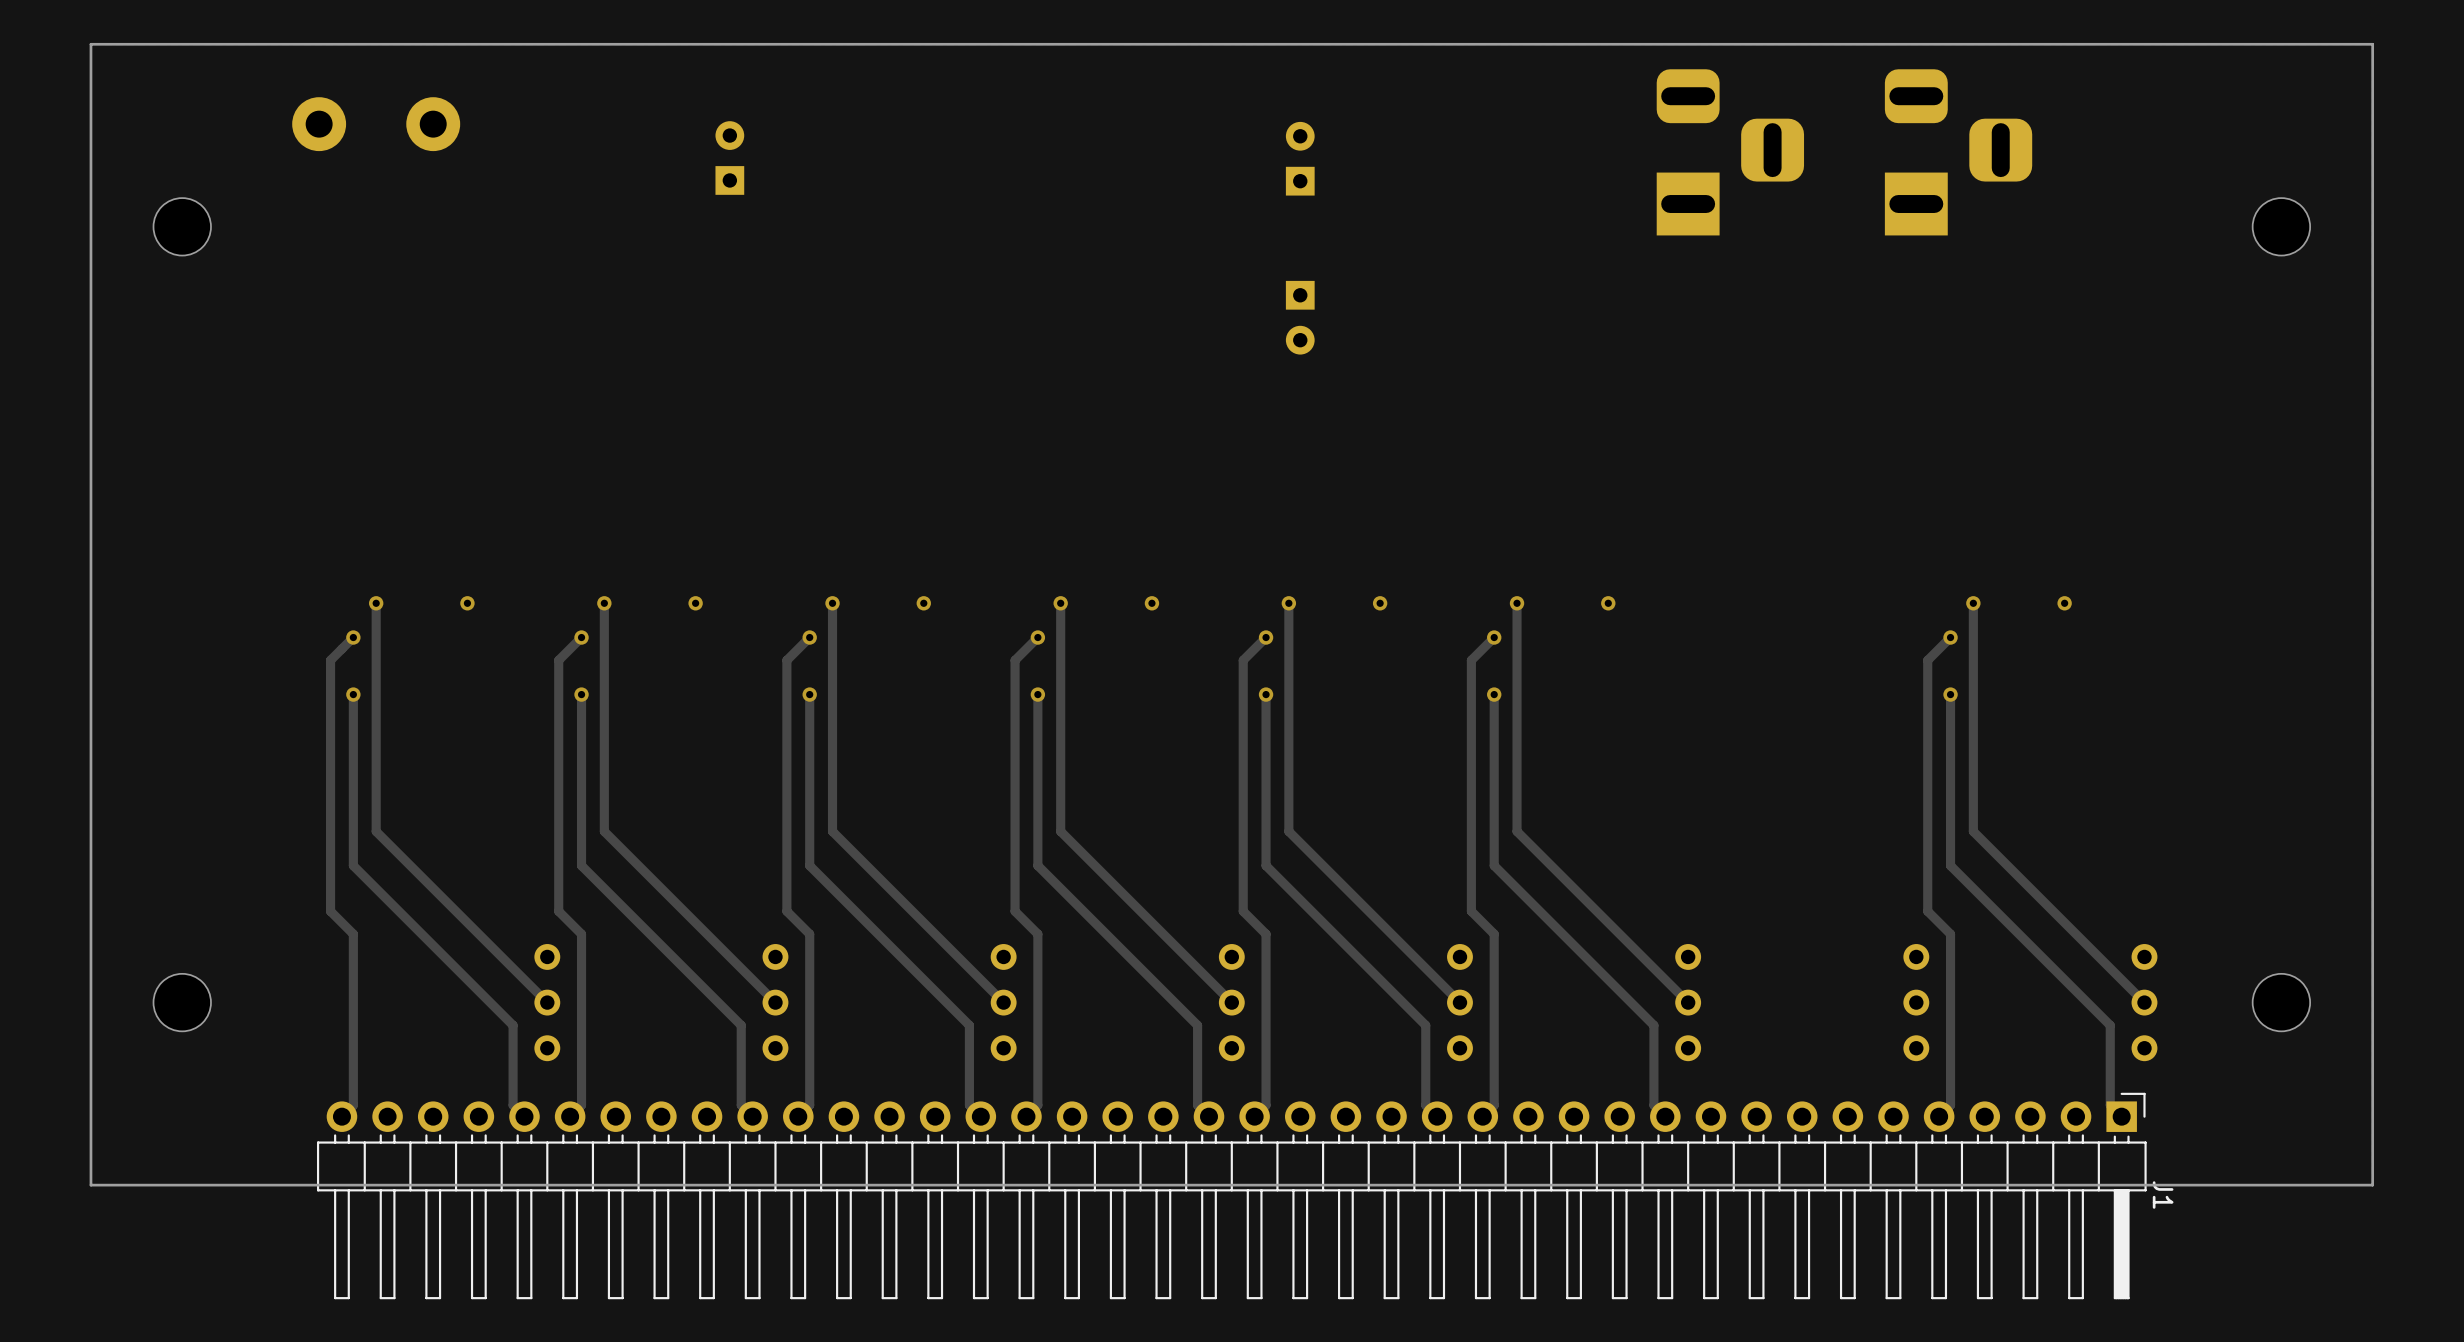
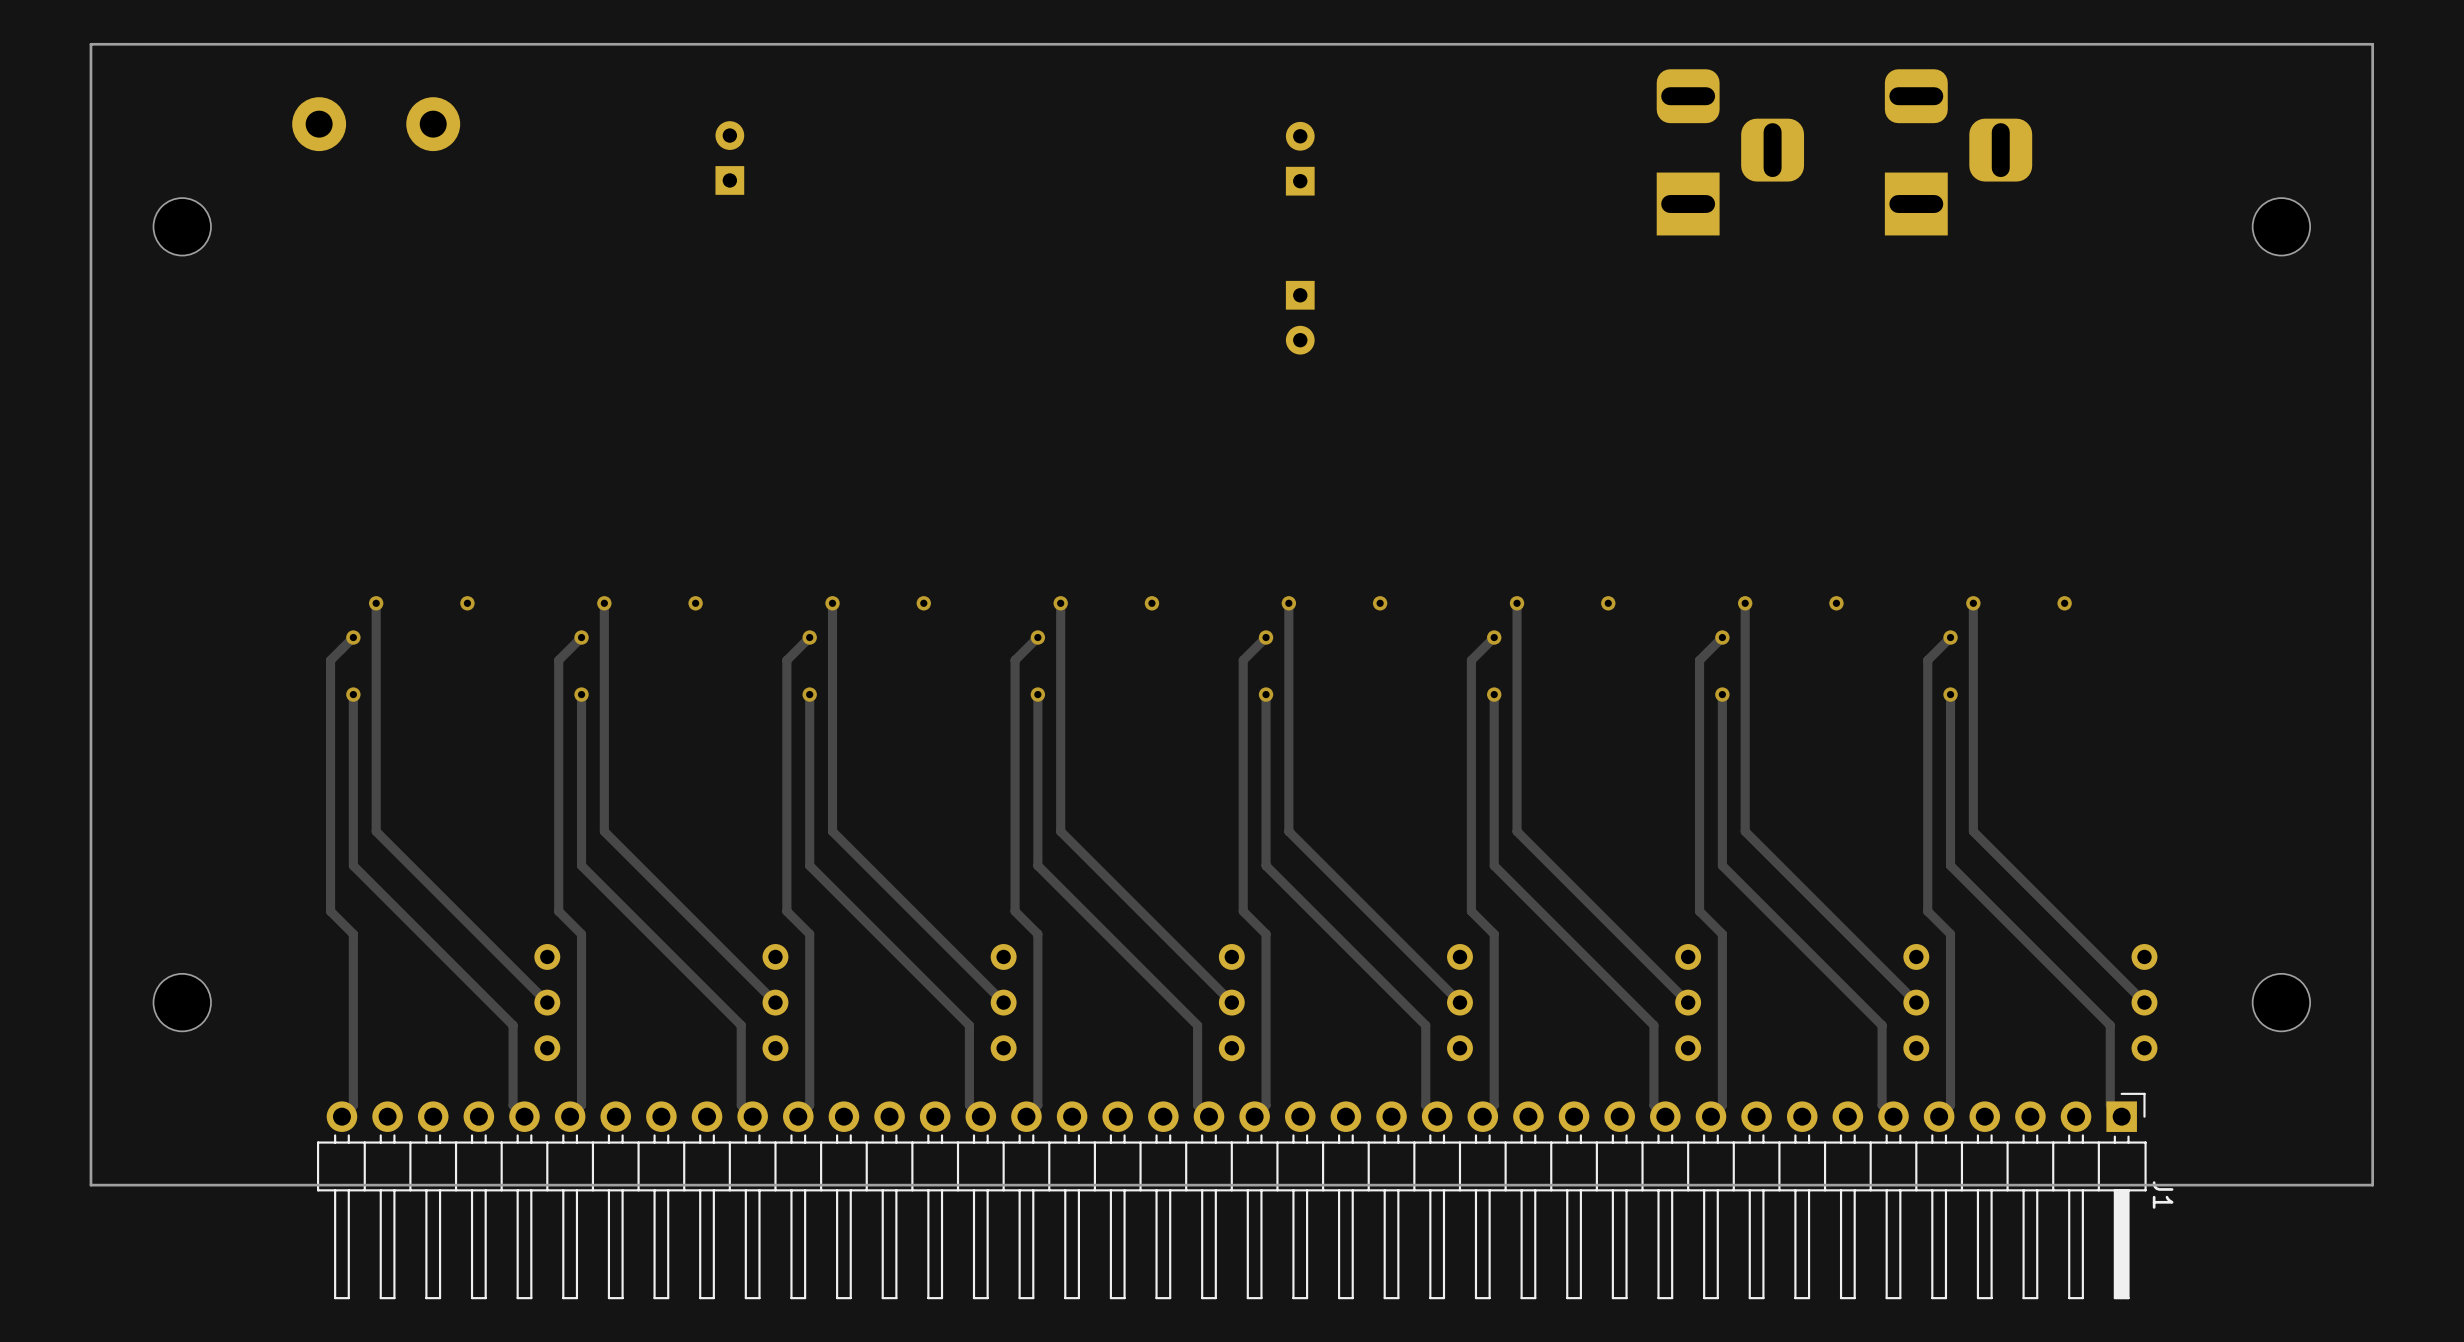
track: none -> (1745, 603) (1745, 831) (1916, 1002)
via: none -> (1745, 603)
via: none -> (1836, 603)
track: none -> (1722, 637) (1699, 660) (1699, 911) (1722, 934) (1722, 1105) (1710, 1116)
via: none -> (1722, 637)
track: none -> (1722, 694) (1722, 865) (1882, 1025) (1882, 1105) (1893, 1116)
via: none -> (1722, 694)

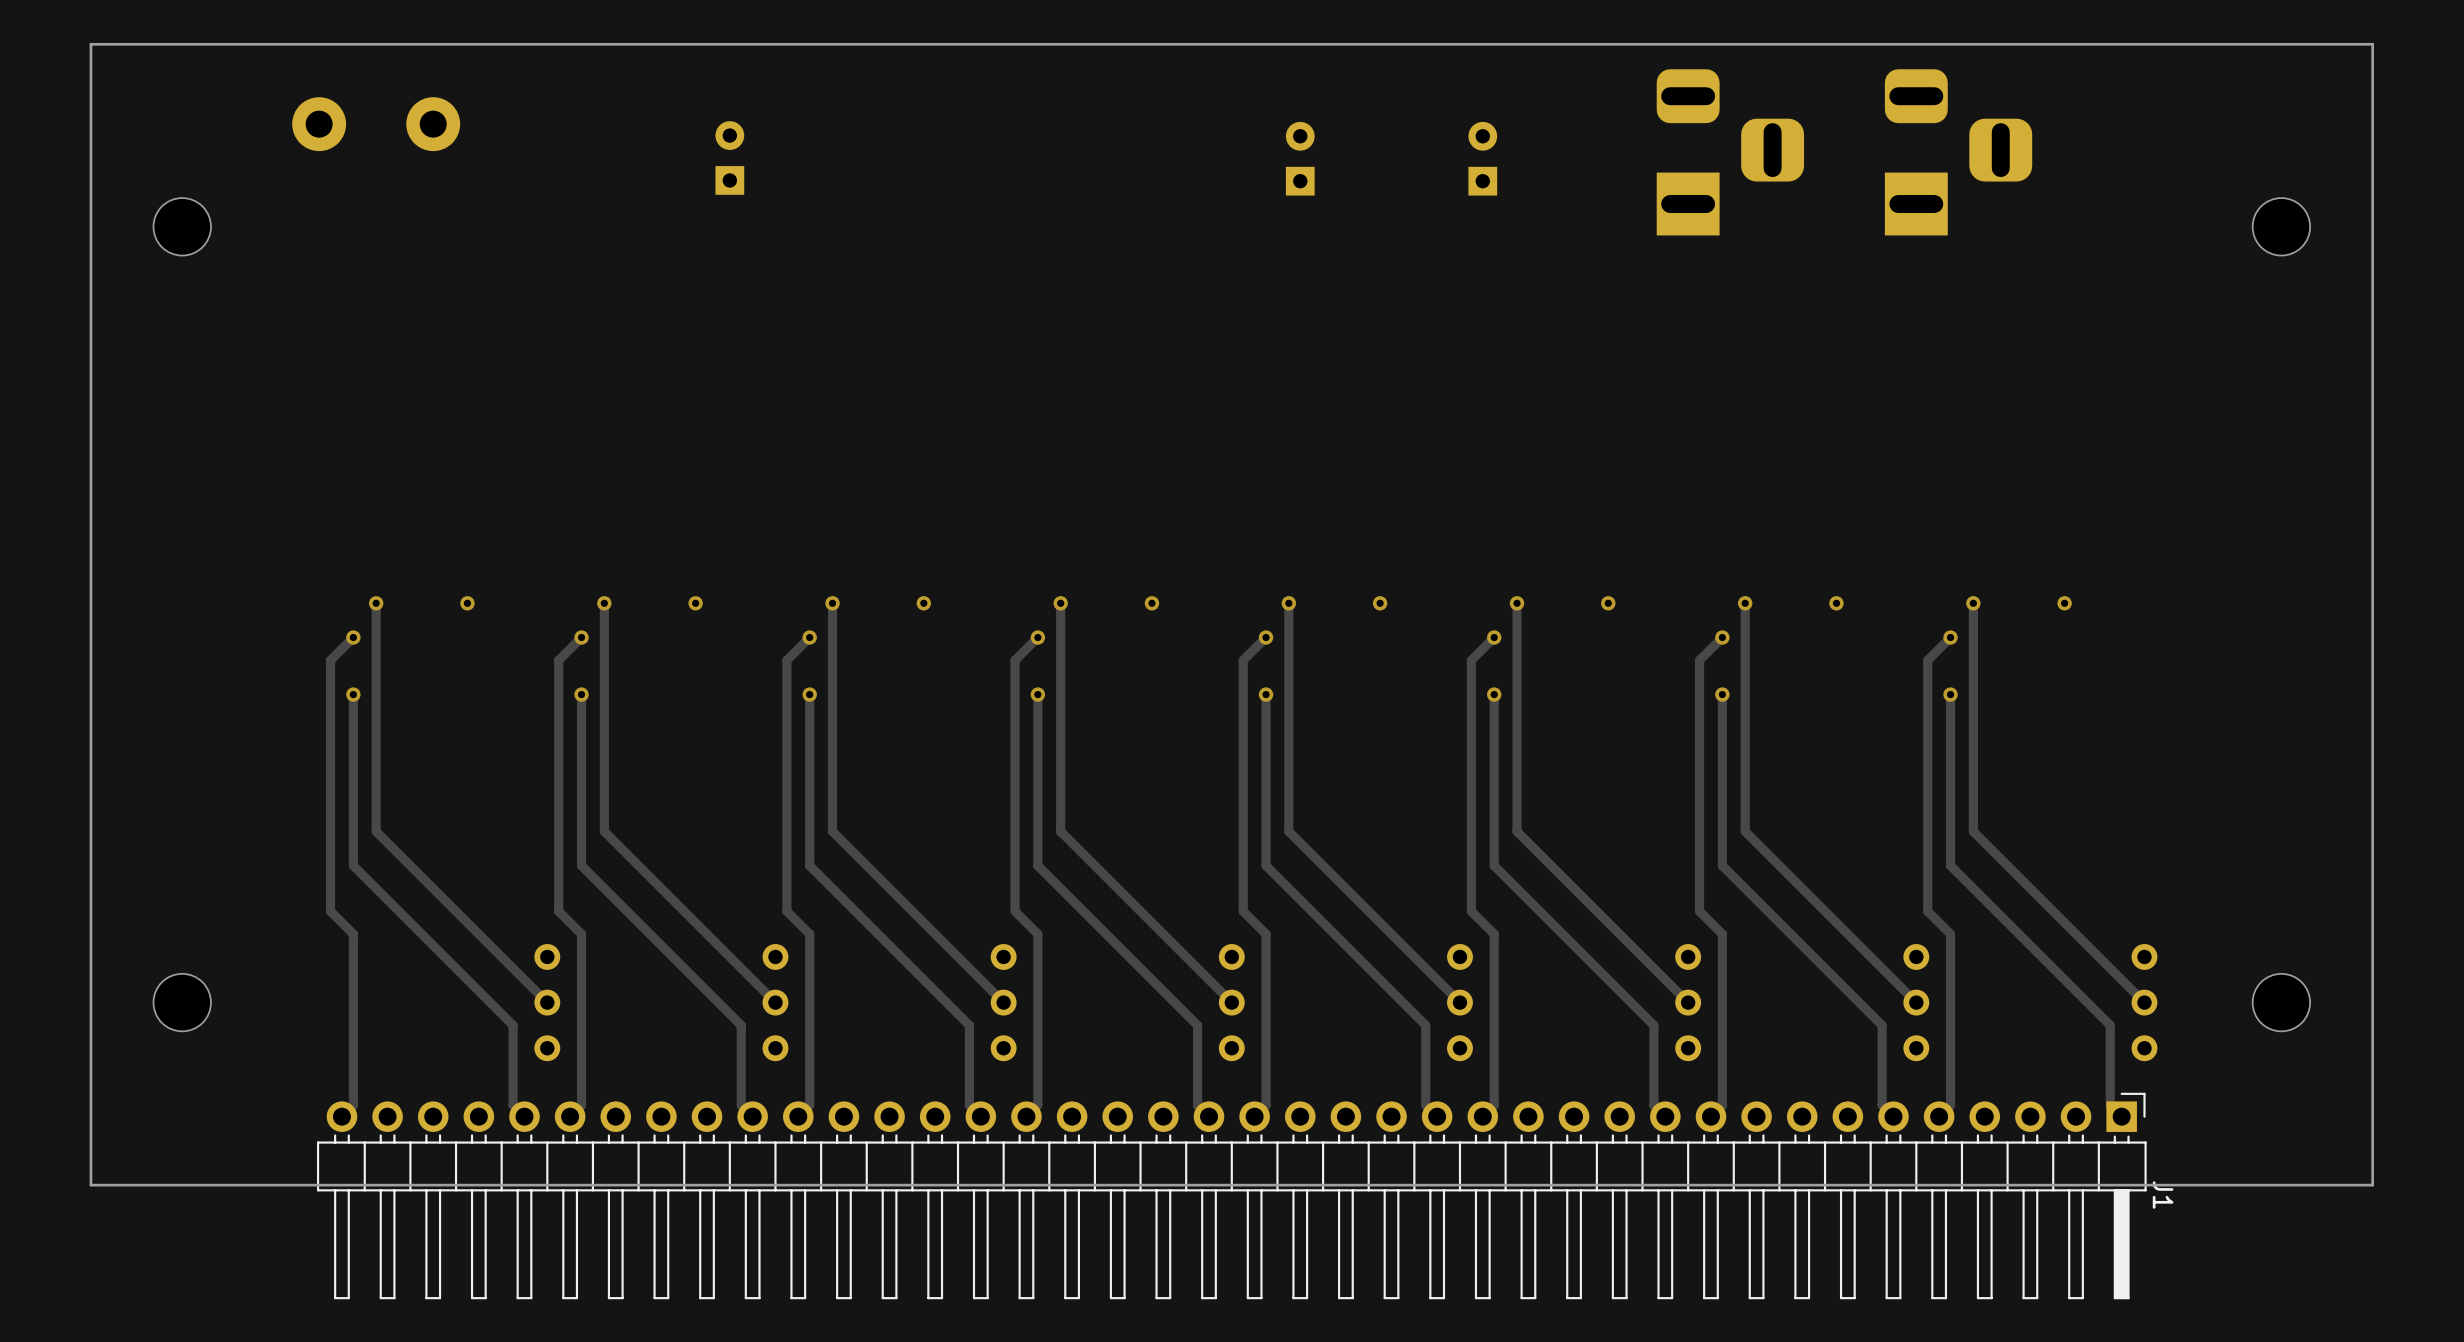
part rotation: 0° (1300, 317) -> 180° (1482, 158)
part position: (1300, 317) -> (1482, 158)

